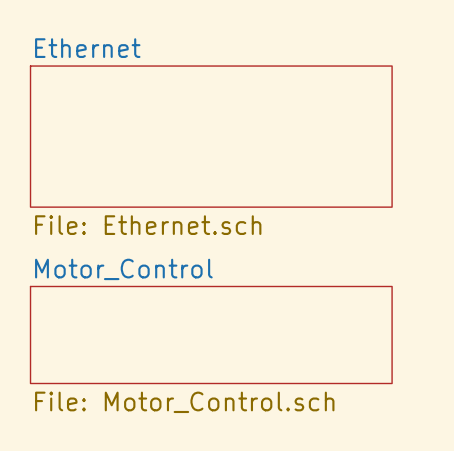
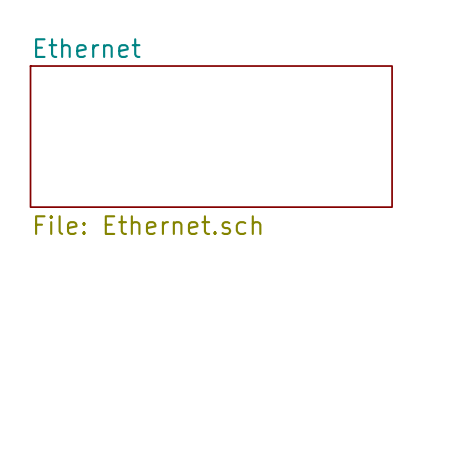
sheet Motor_Control: File: Motor_Control.sch (211, 334) -> none

